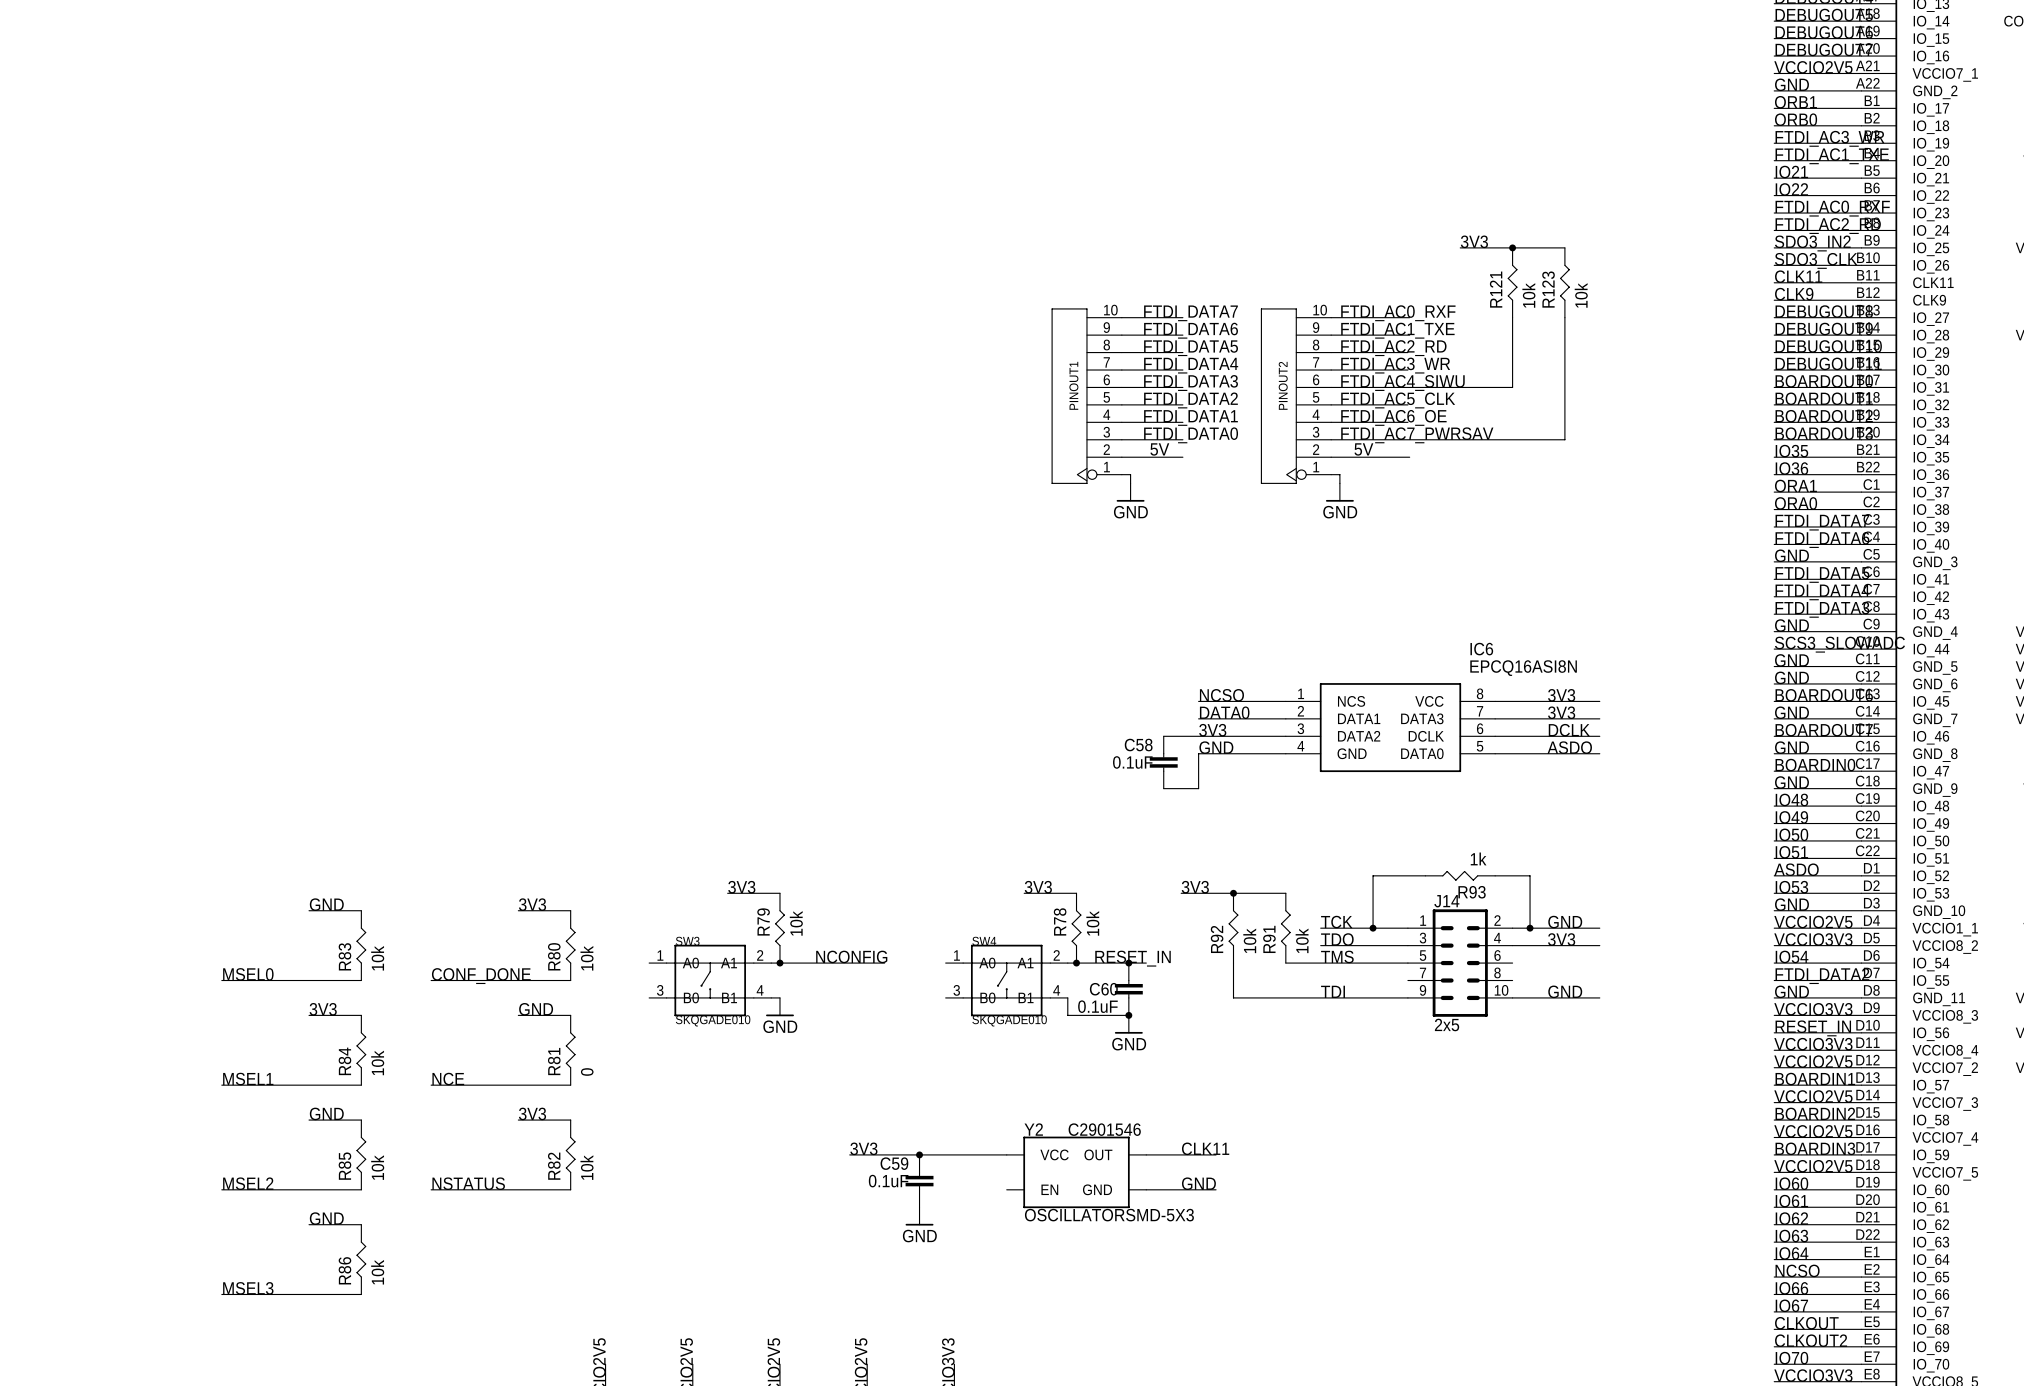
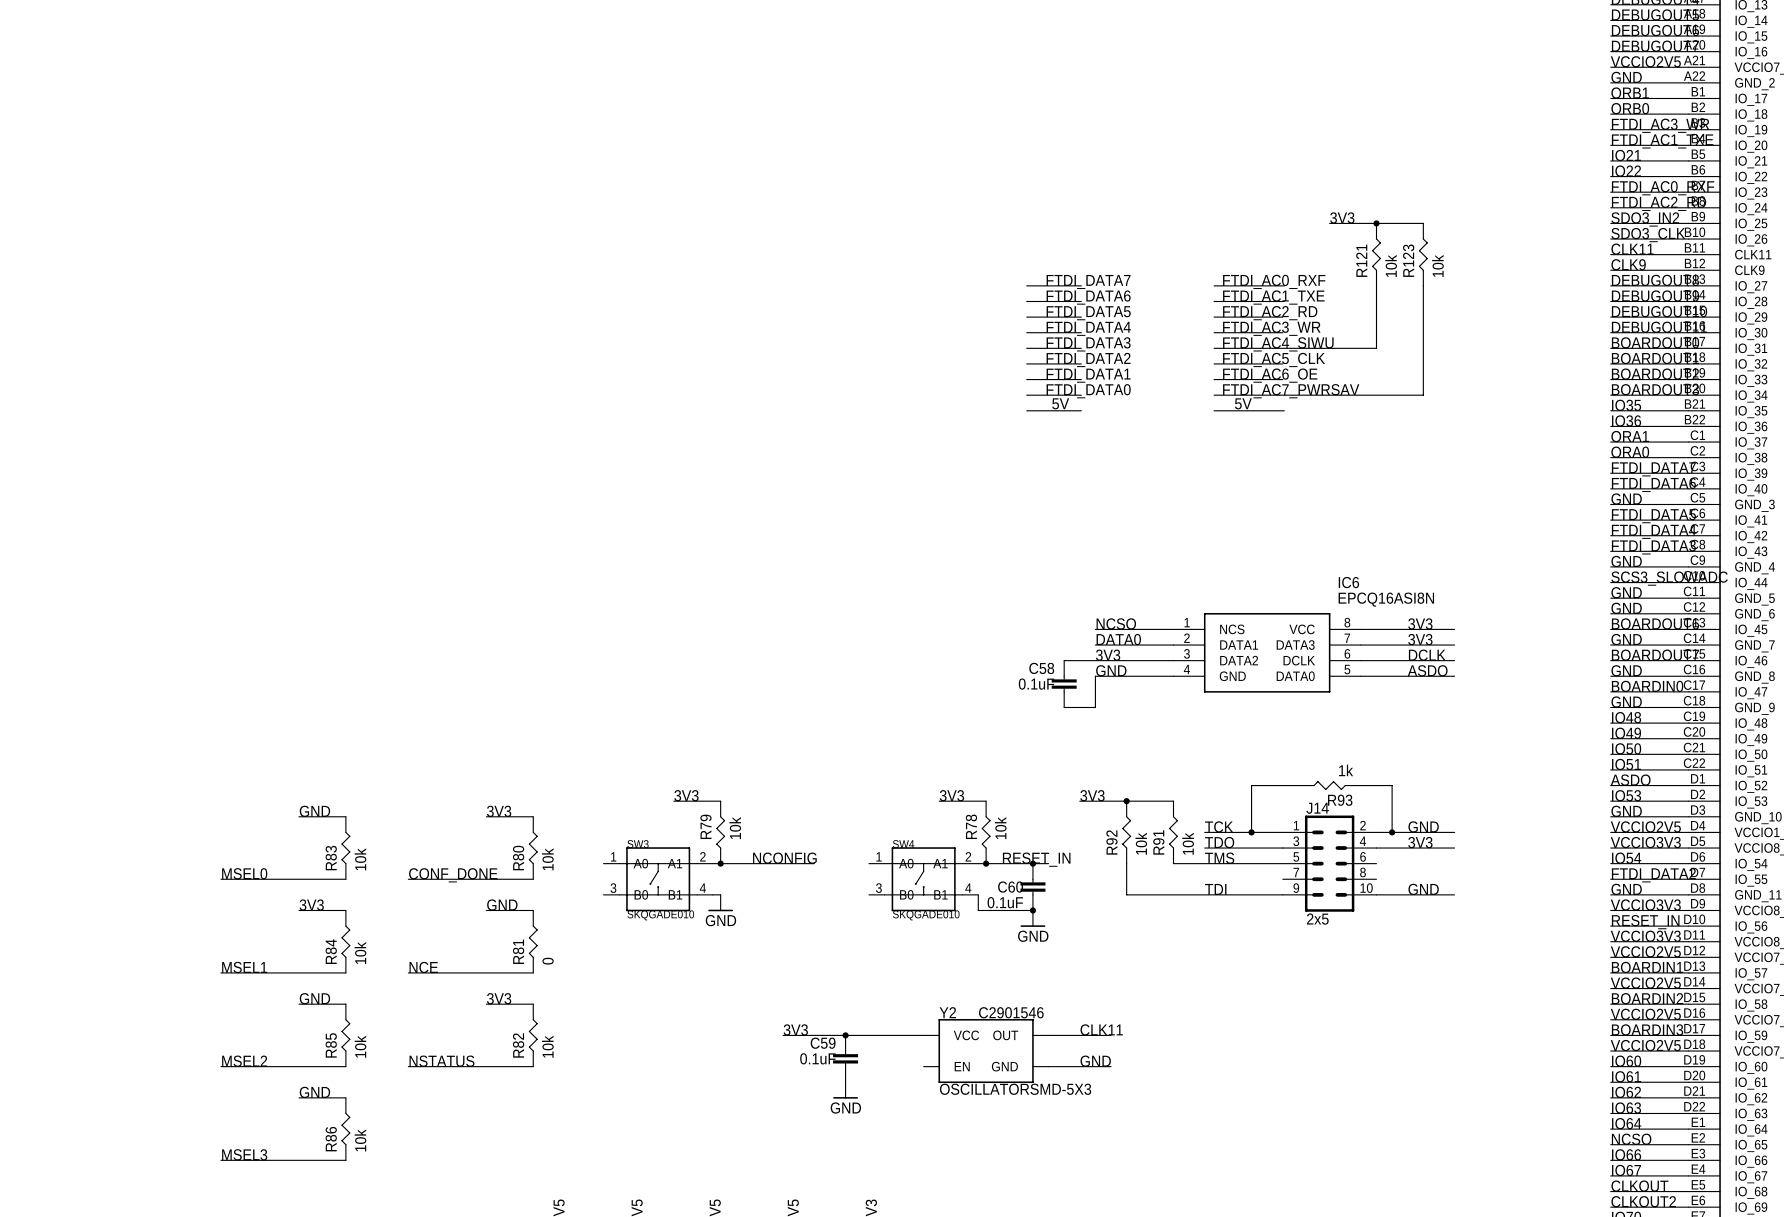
PINOUT1: (1086, 396) -> none
PINOUT2: (1296, 396) -> none
wire: (1121, 474) (1130, 474) (1130, 483) -> none
wire: (1331, 474) (1339, 474) (1339, 483) -> none
power symbol: GND (1130, 492) -> none
power symbol: GND (1339, 492) -> none

